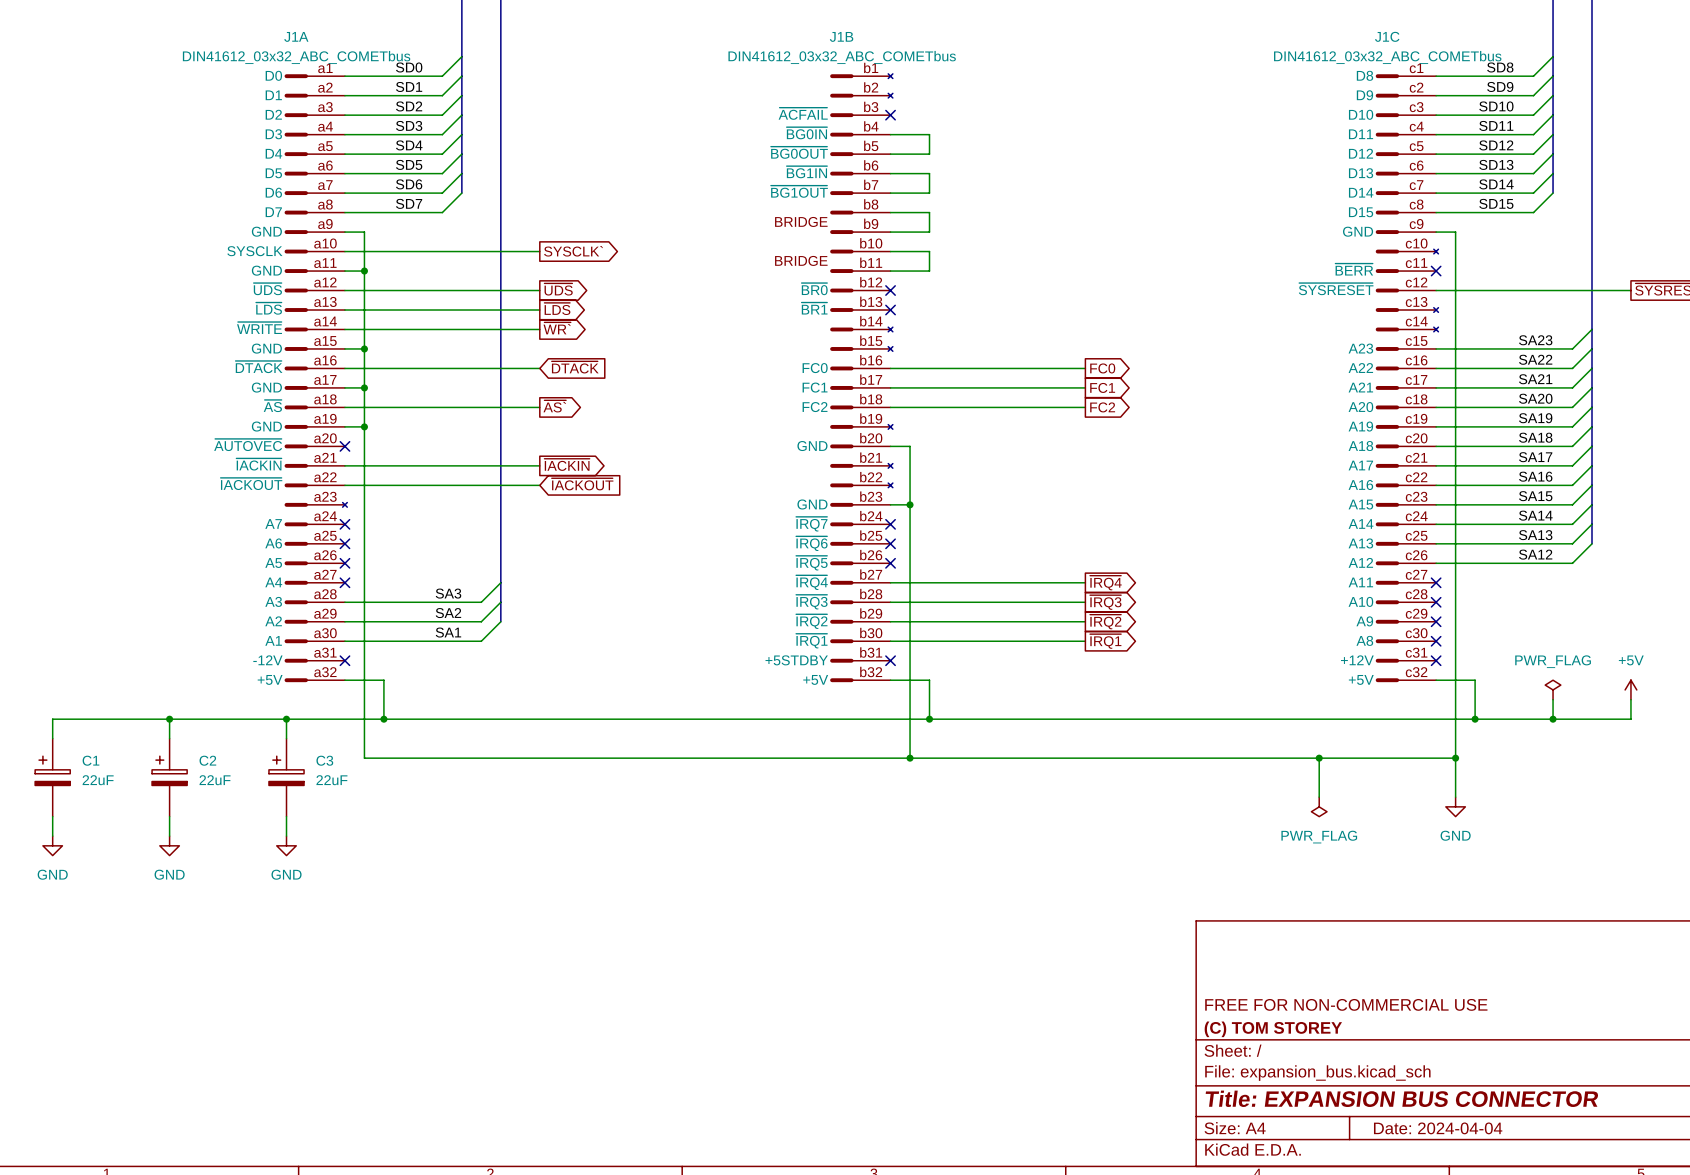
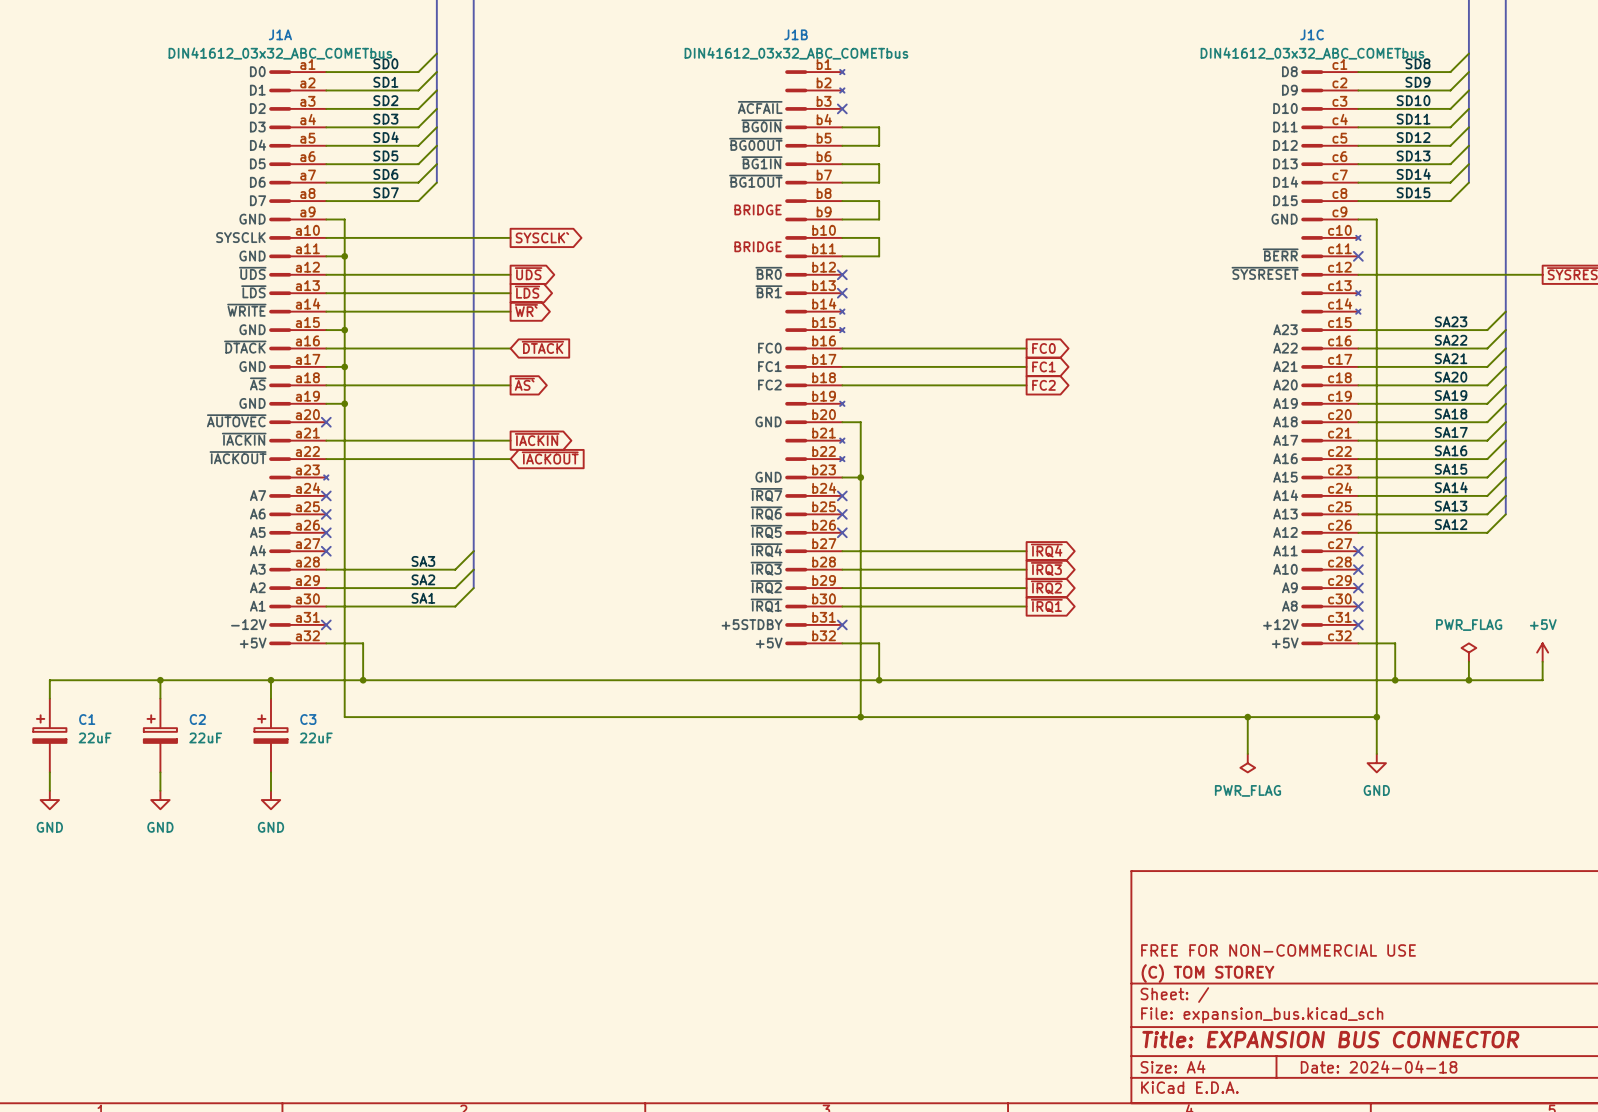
title block: Date: 2024-04-04 (1438, 1128) -> Date: 2024-04-18 (1379, 1067)

